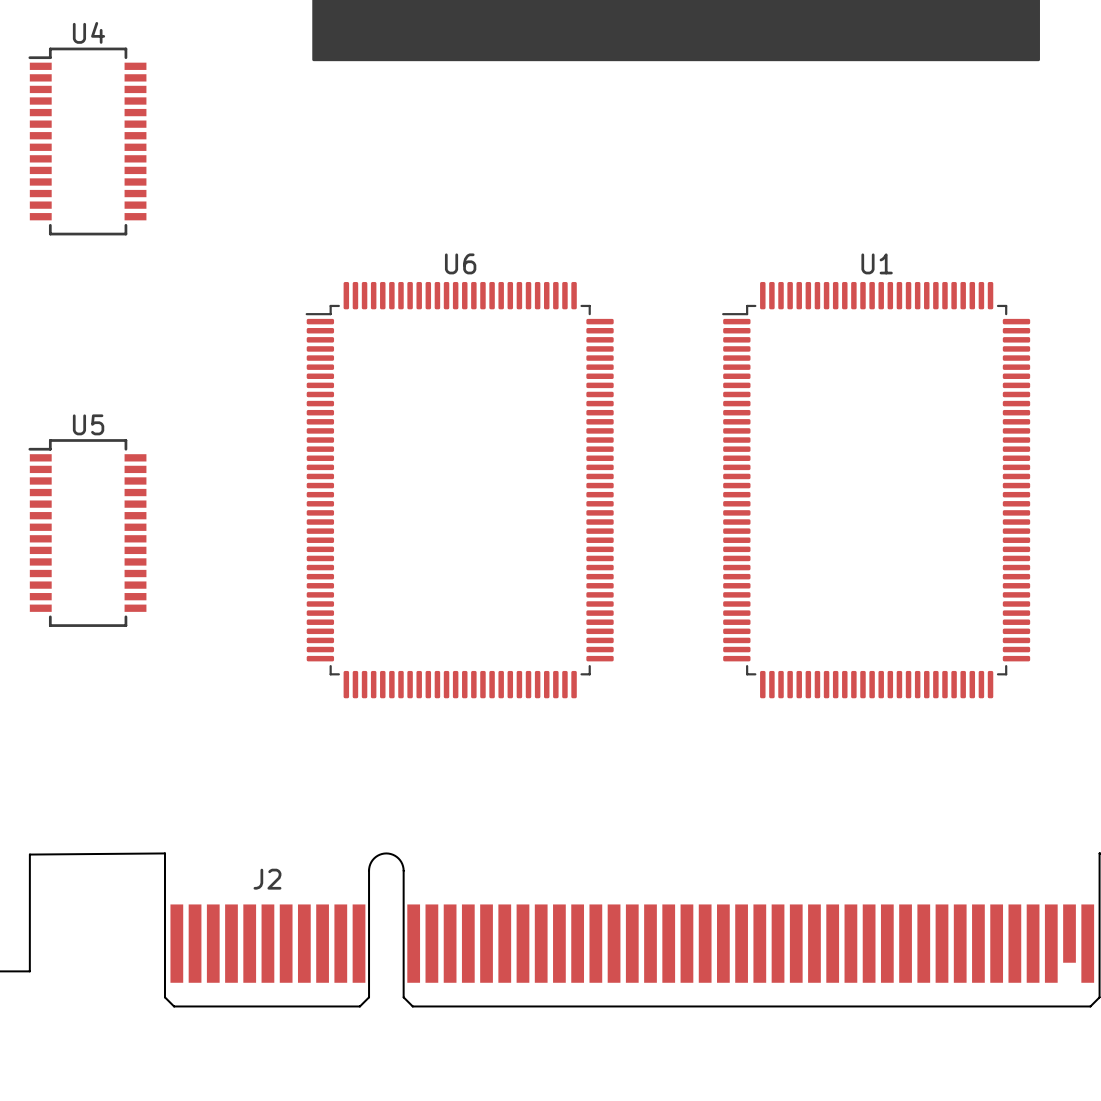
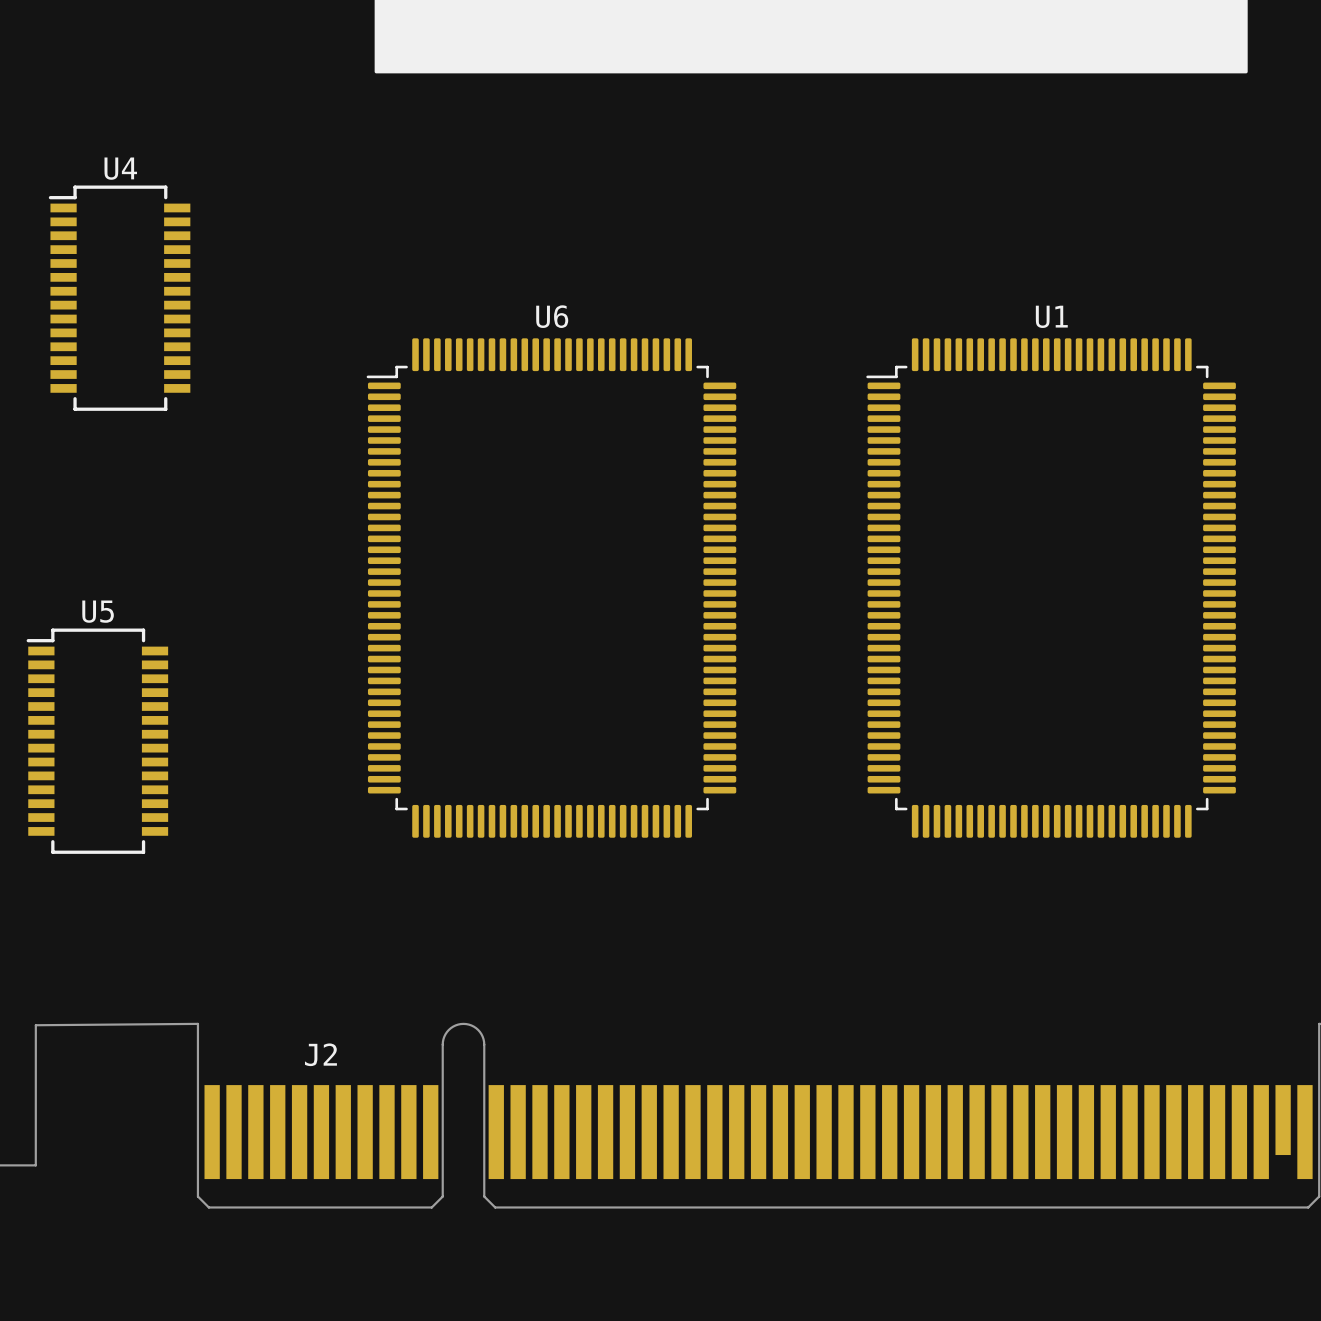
U4 position: (87, 141) -> (119, 298)
U5 position: (87, 533) -> (97, 741)

